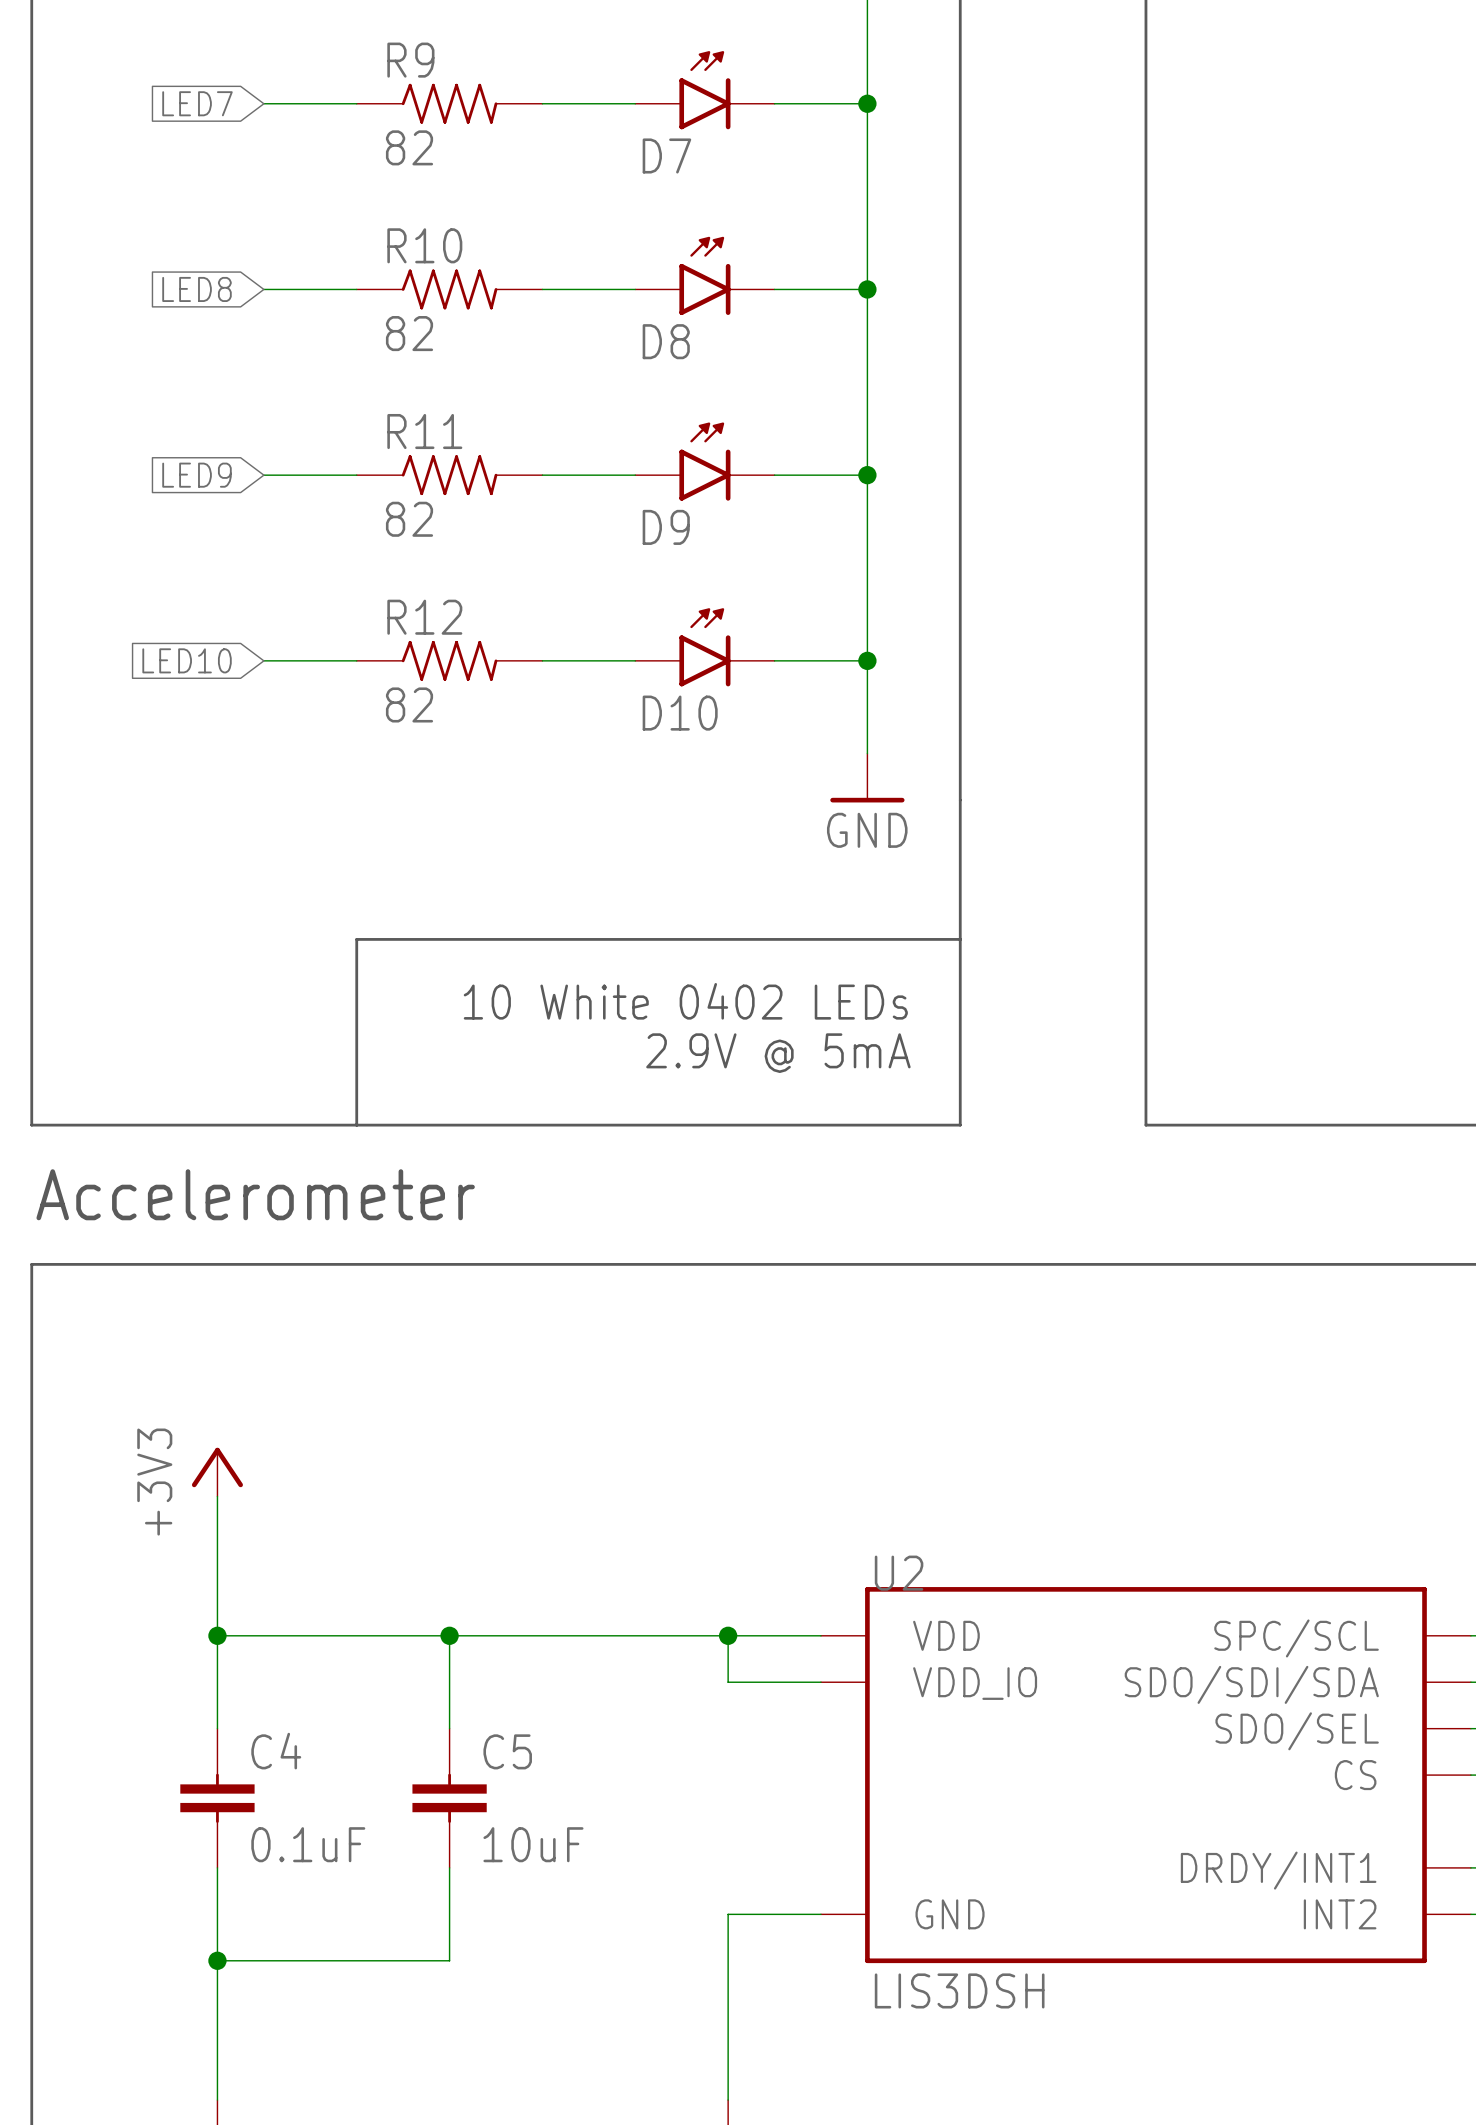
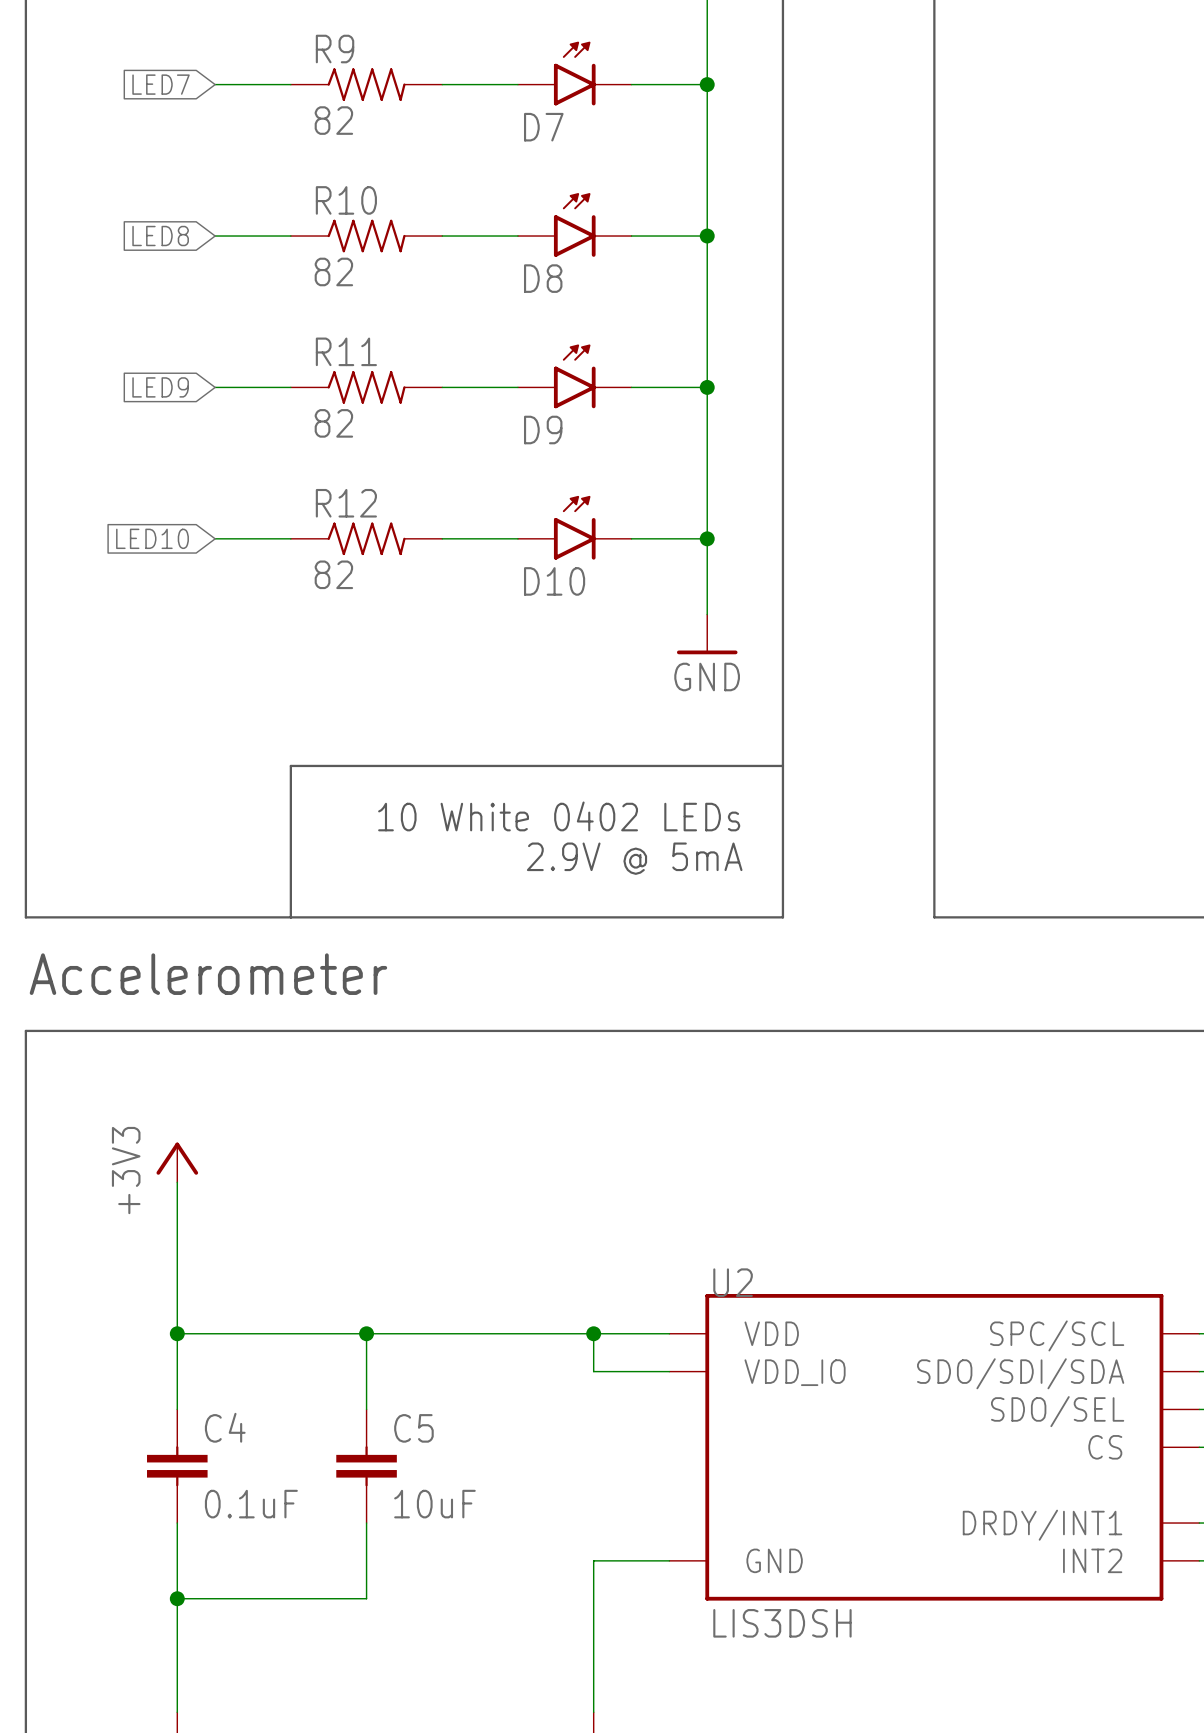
power symbol position: +3V3 (217, 1472) -> +3V3 (177, 1162)

